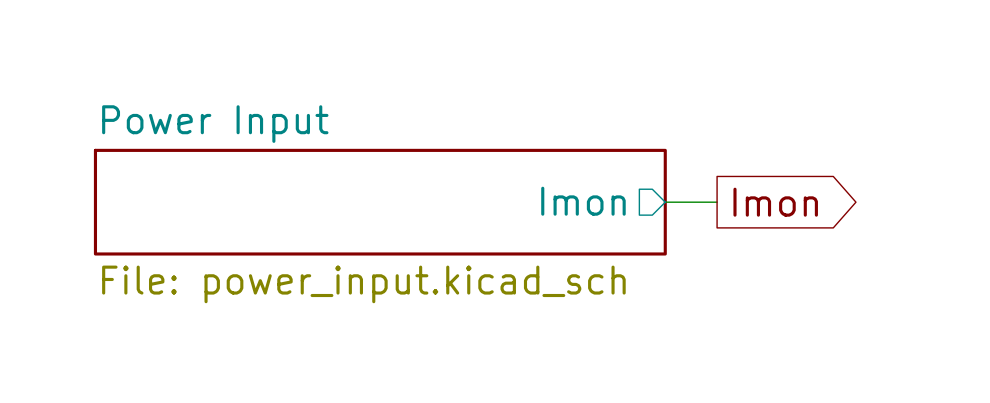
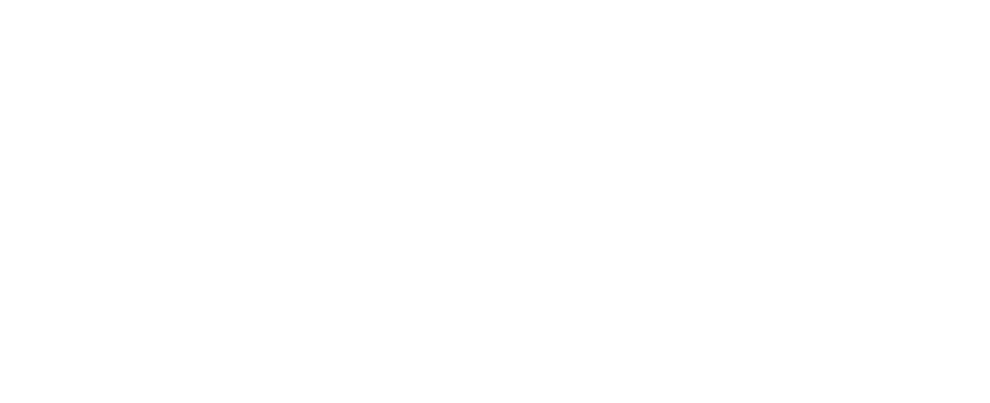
sheet pin: Imon (583, 201) -> none
sheet Power Input: File: power_input.kicad_sch (380, 202) -> none
wire: (665, 202) (717, 202) -> none
global label: Imon (775, 202) -> none

